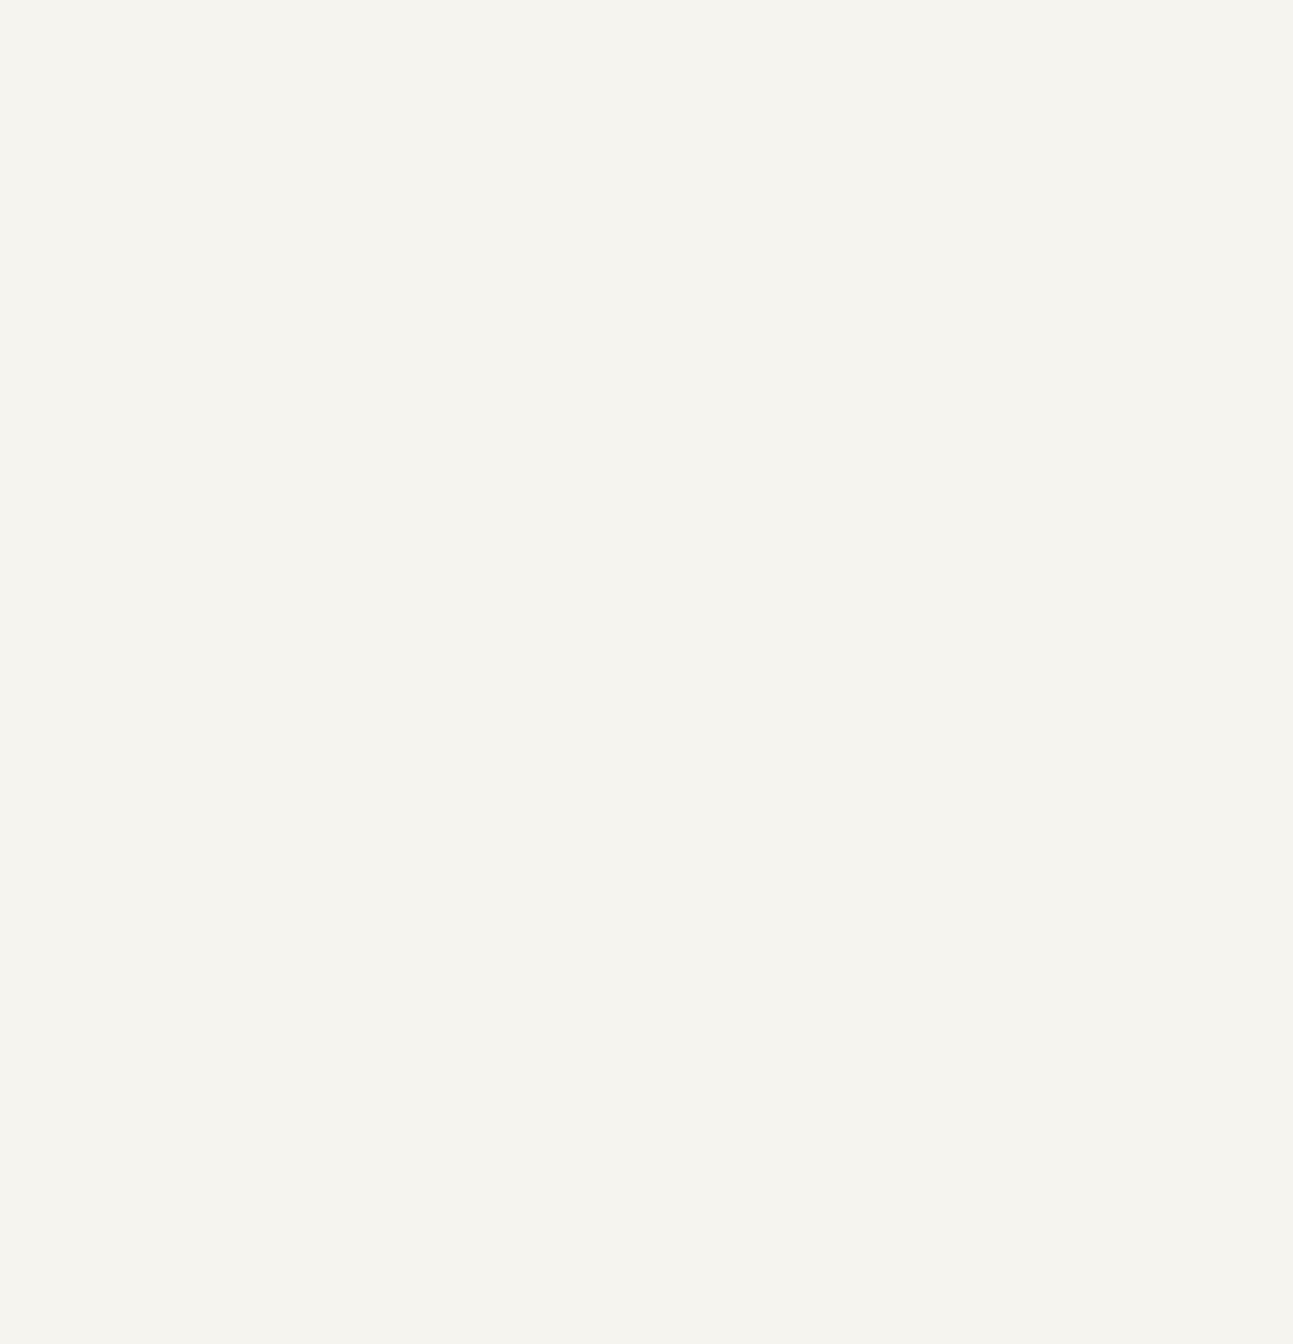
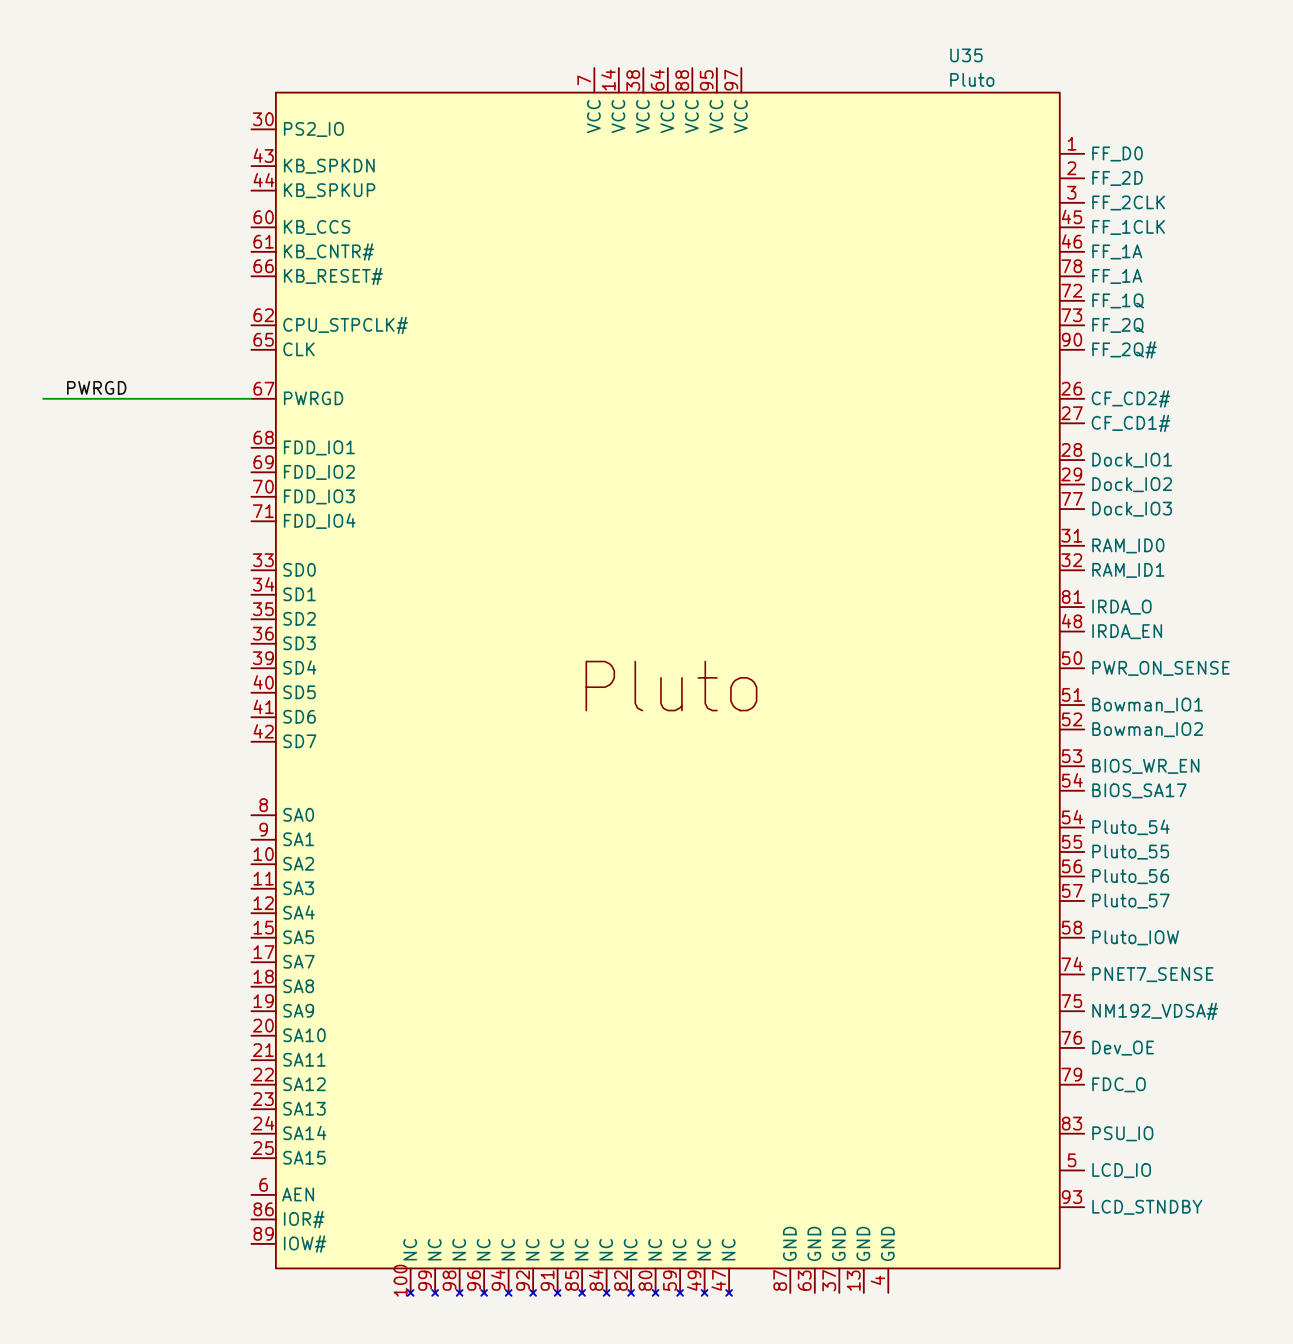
label: none -> PWRGD (96, 387)
wire: none -> (43, 398) (251, 398)
U35: none -> Pluto (667, 681)

